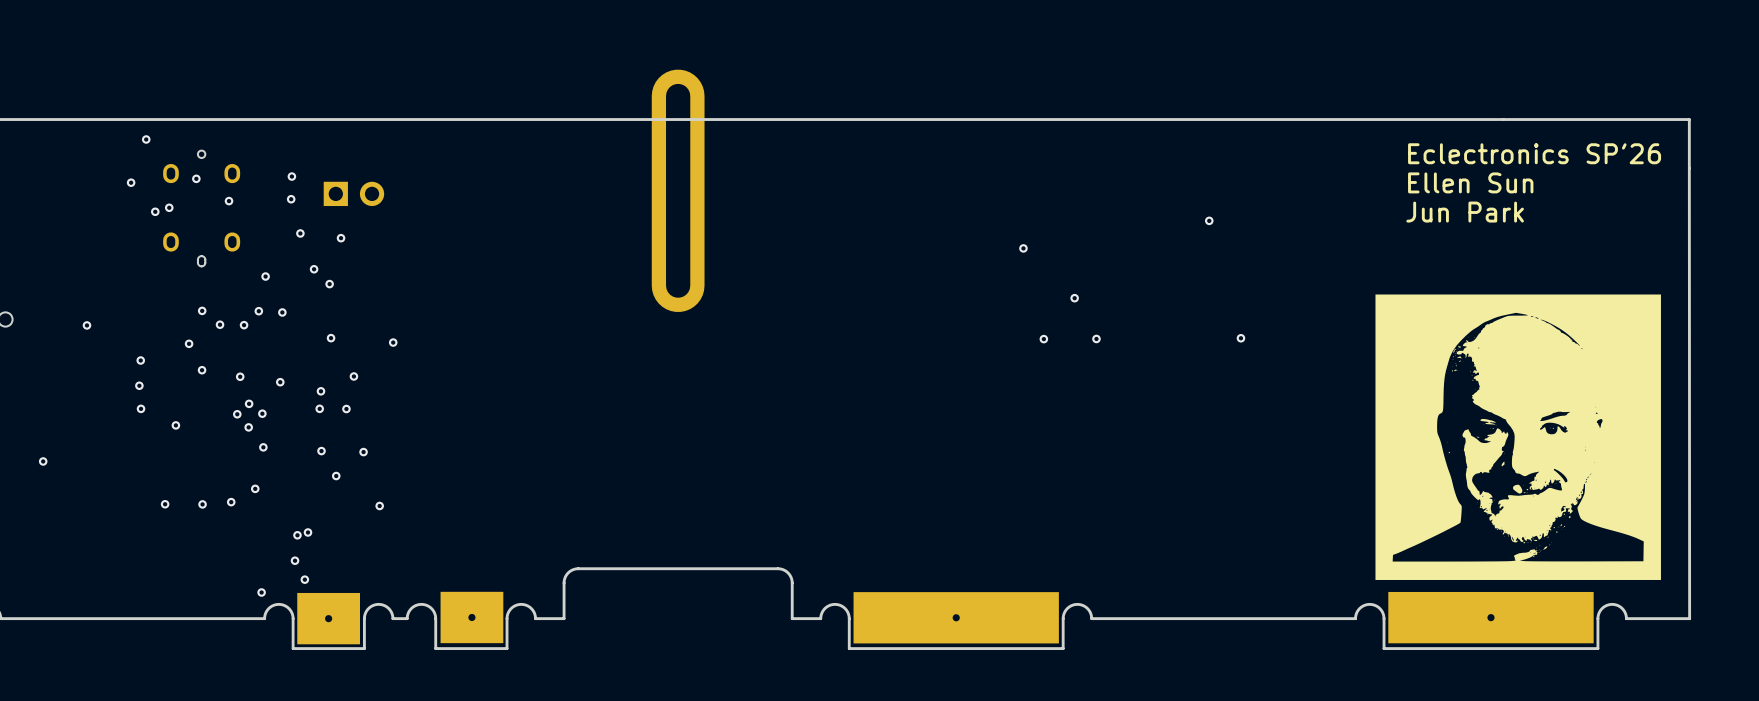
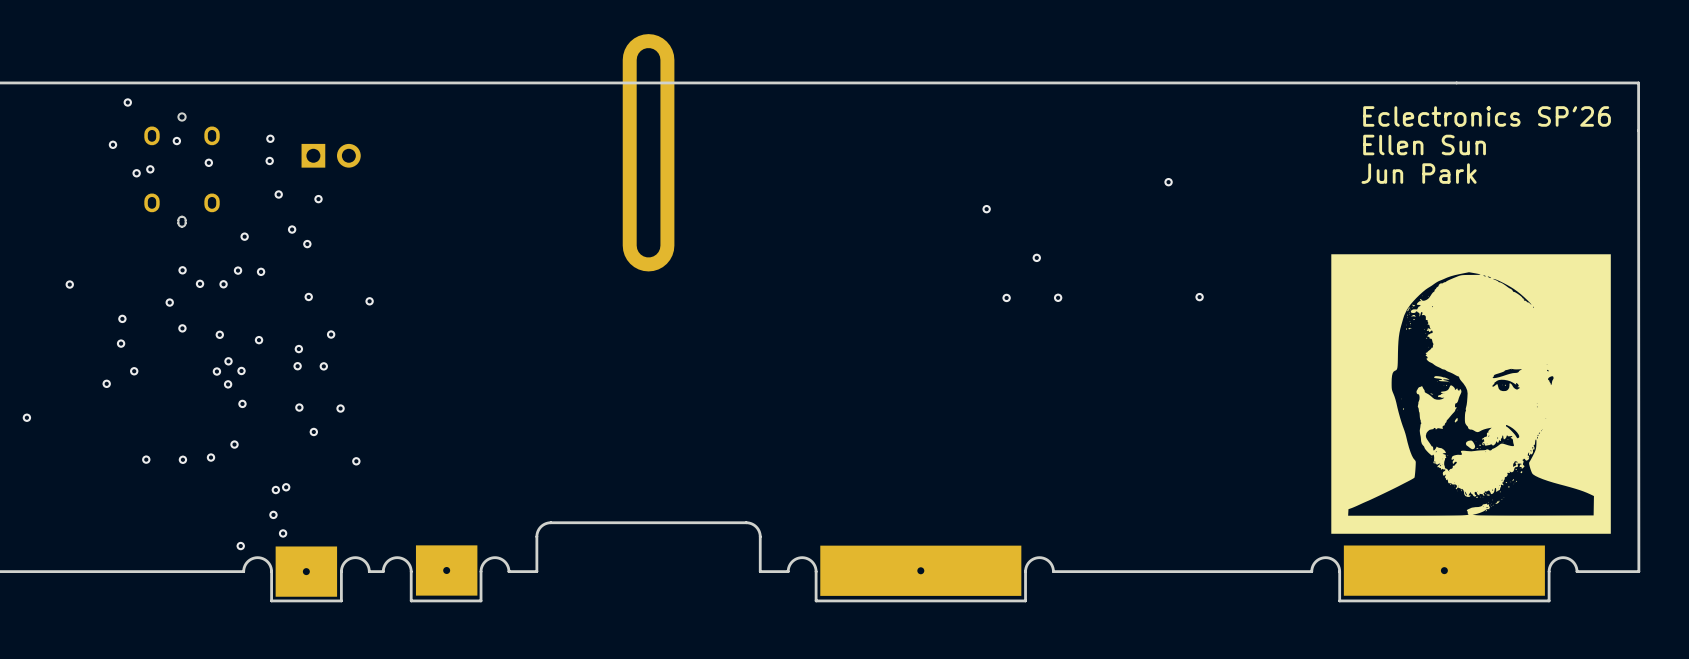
via: (141, 408) -> none
via: none -> (134, 371)
via: (175, 425) -> none
via: none -> (106, 383)

